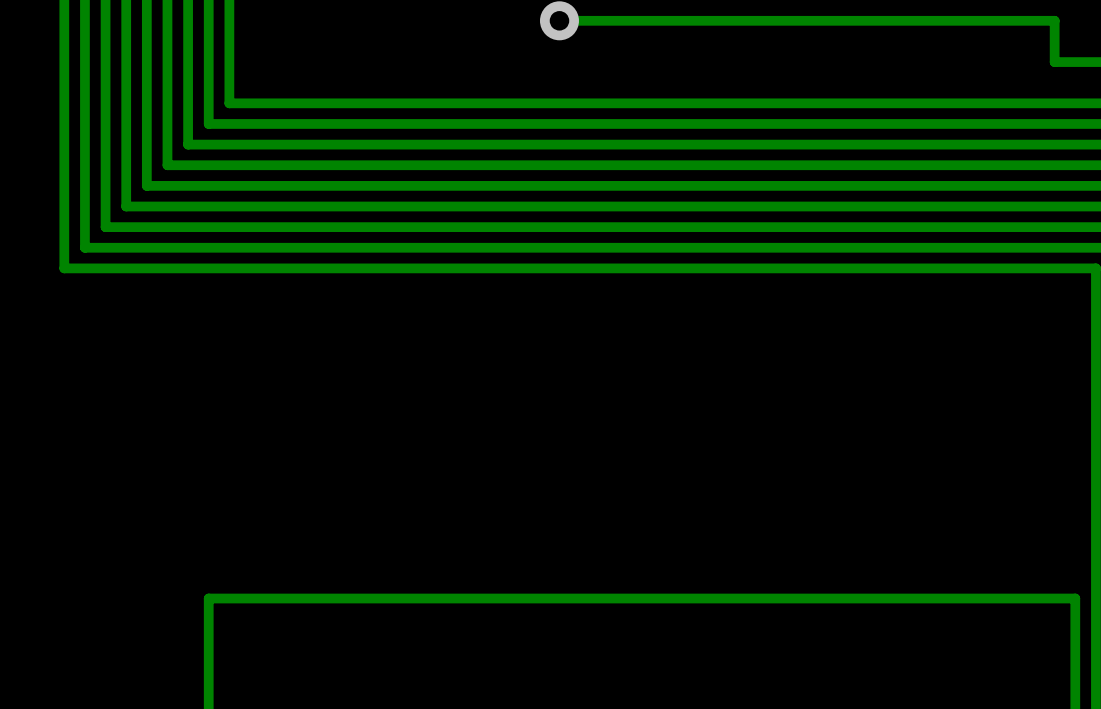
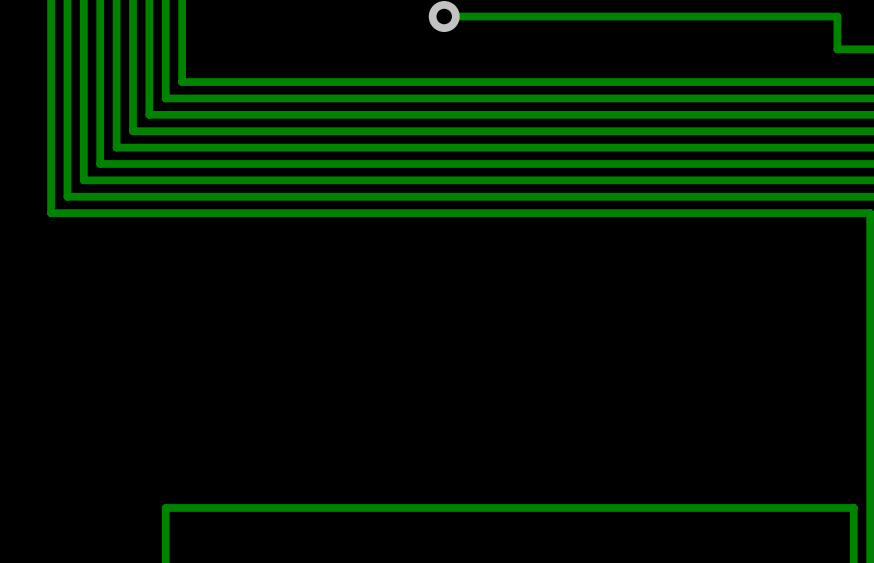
bottom track: (1075, 639) (1075, 598) (208, 598) (208, 639) -> (853, 507) (165, 507)

